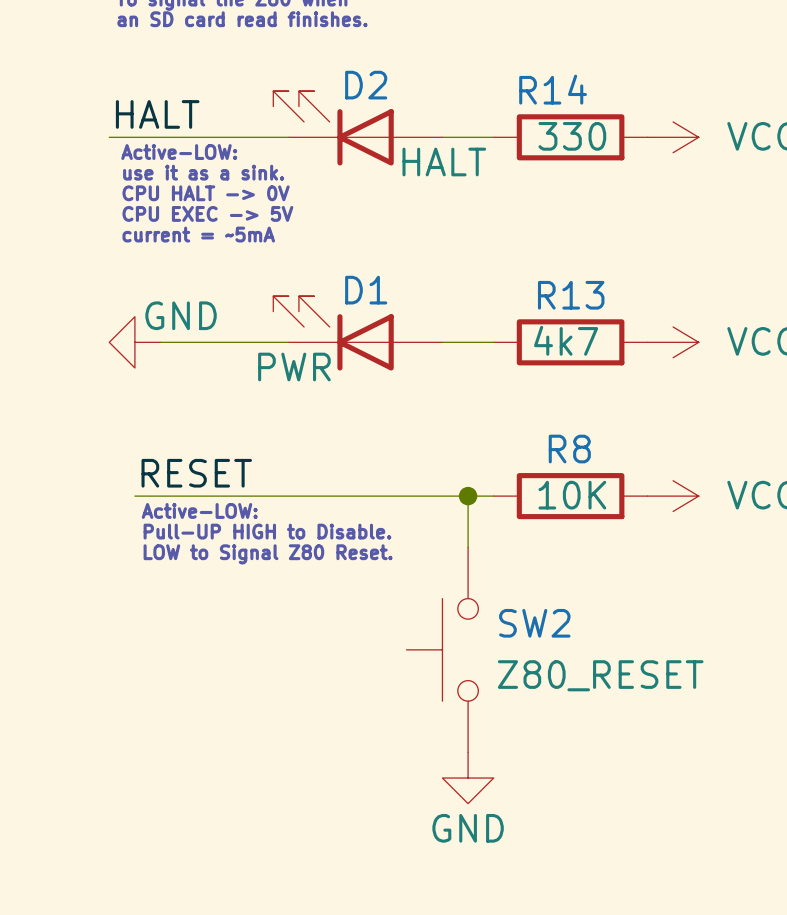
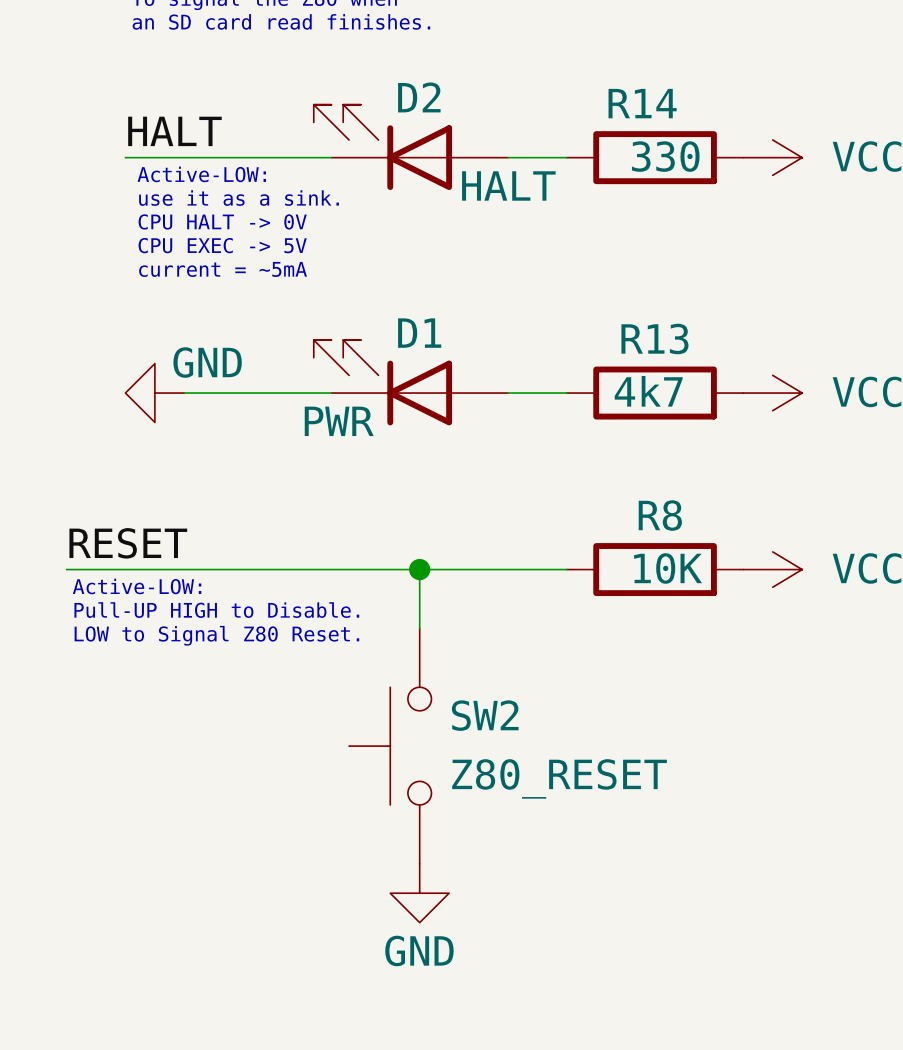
label position: RESET (196, 473) -> RESET (128, 543)
wire: none -> (66, 569) (154, 569)
wire: (468, 496) (468, 547) -> (419, 569) (419, 628)
junction position: (468, 496) -> (419, 569)
text position: Active-LOW: (199, 510) -> Active-LOW: (137, 586)
text position: Pull-UP HIGH to Disable. (267, 531) -> Pull-UP HIGH to Disable. (216, 610)
text position: LOW to Signal Z80 Reset. (268, 554) -> LOW to Signal Z80 Reset. (216, 635)
SW2 position: (442, 649) -> (390, 746)
power symbol position: GND (468, 778) -> GND (419, 893)

